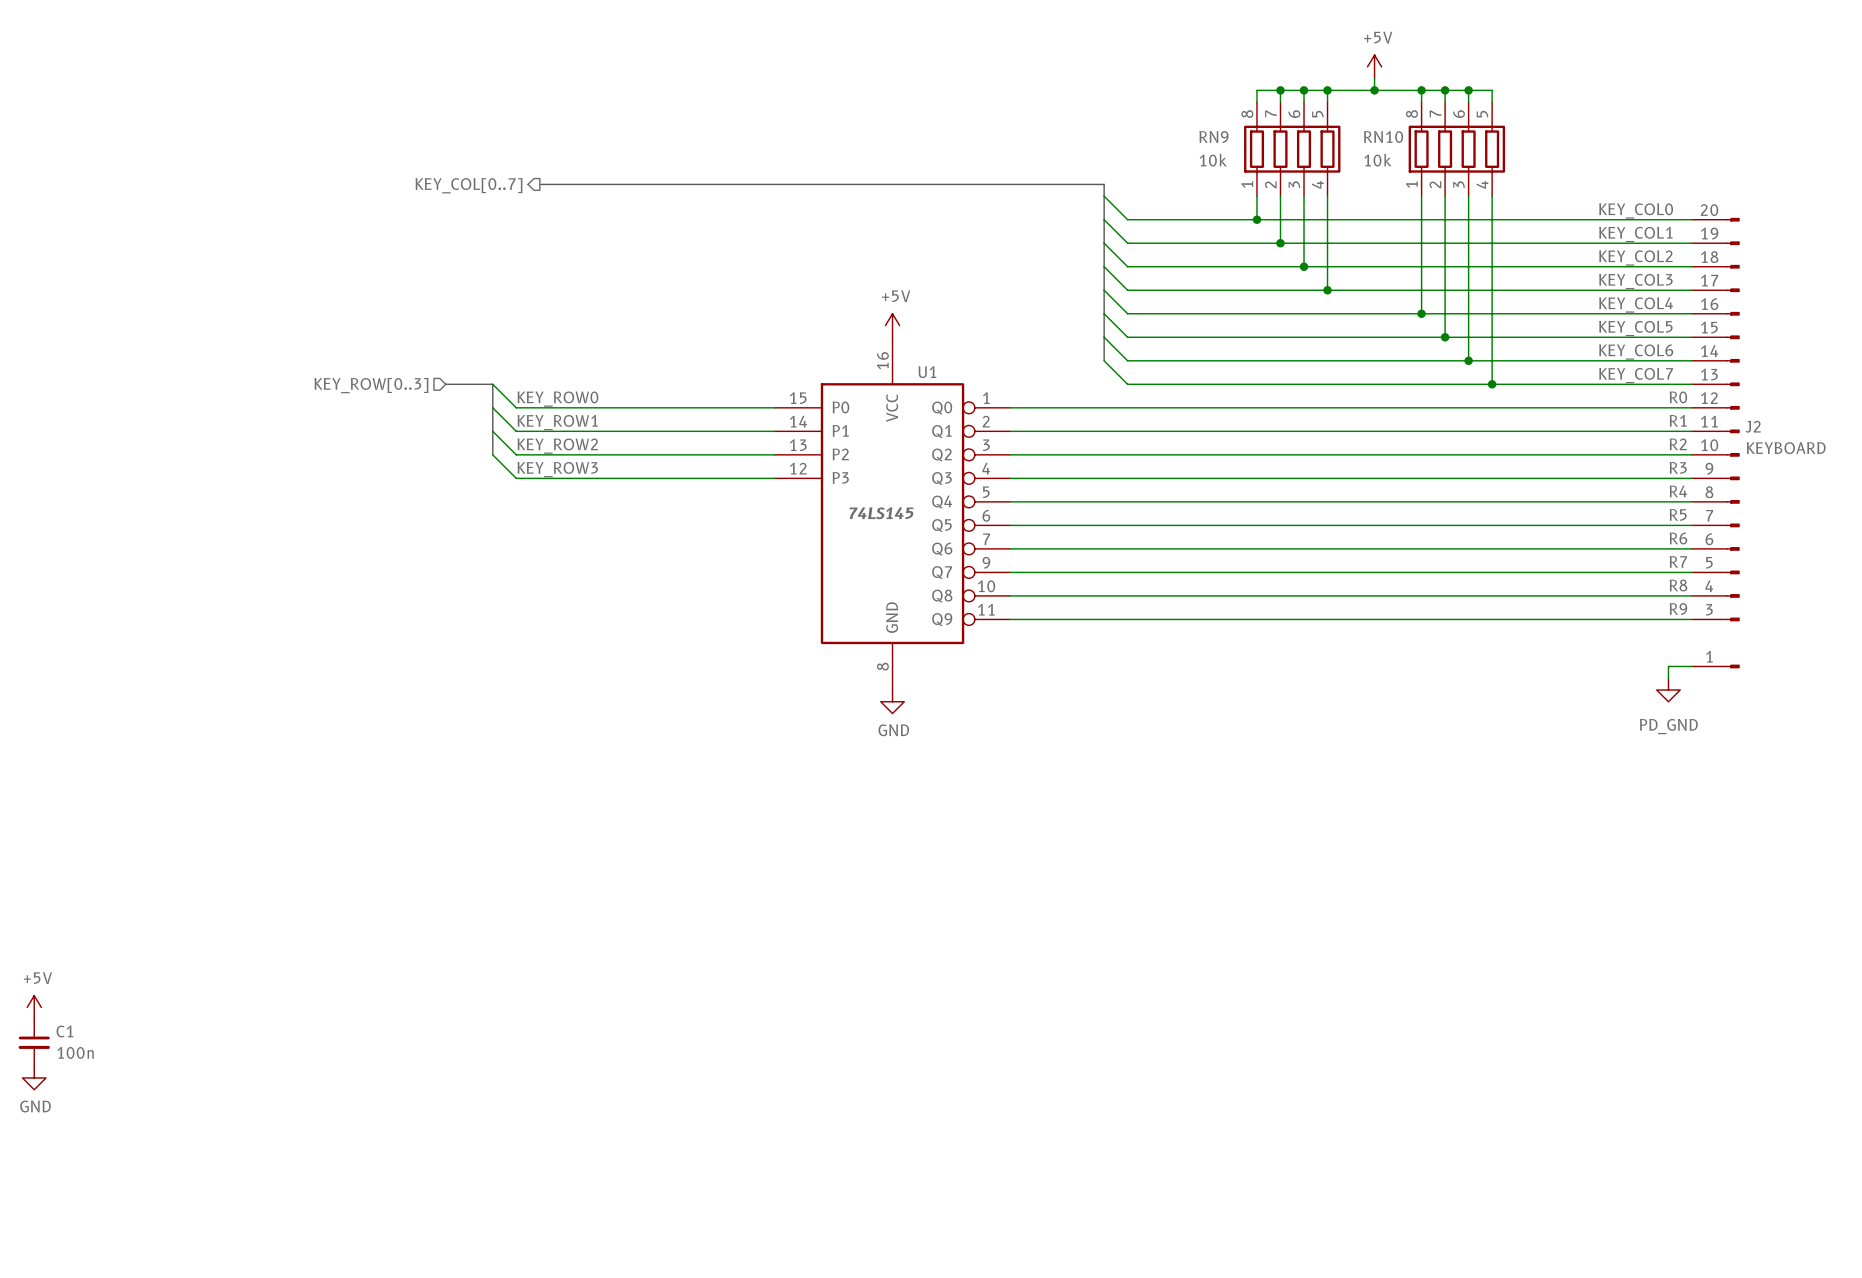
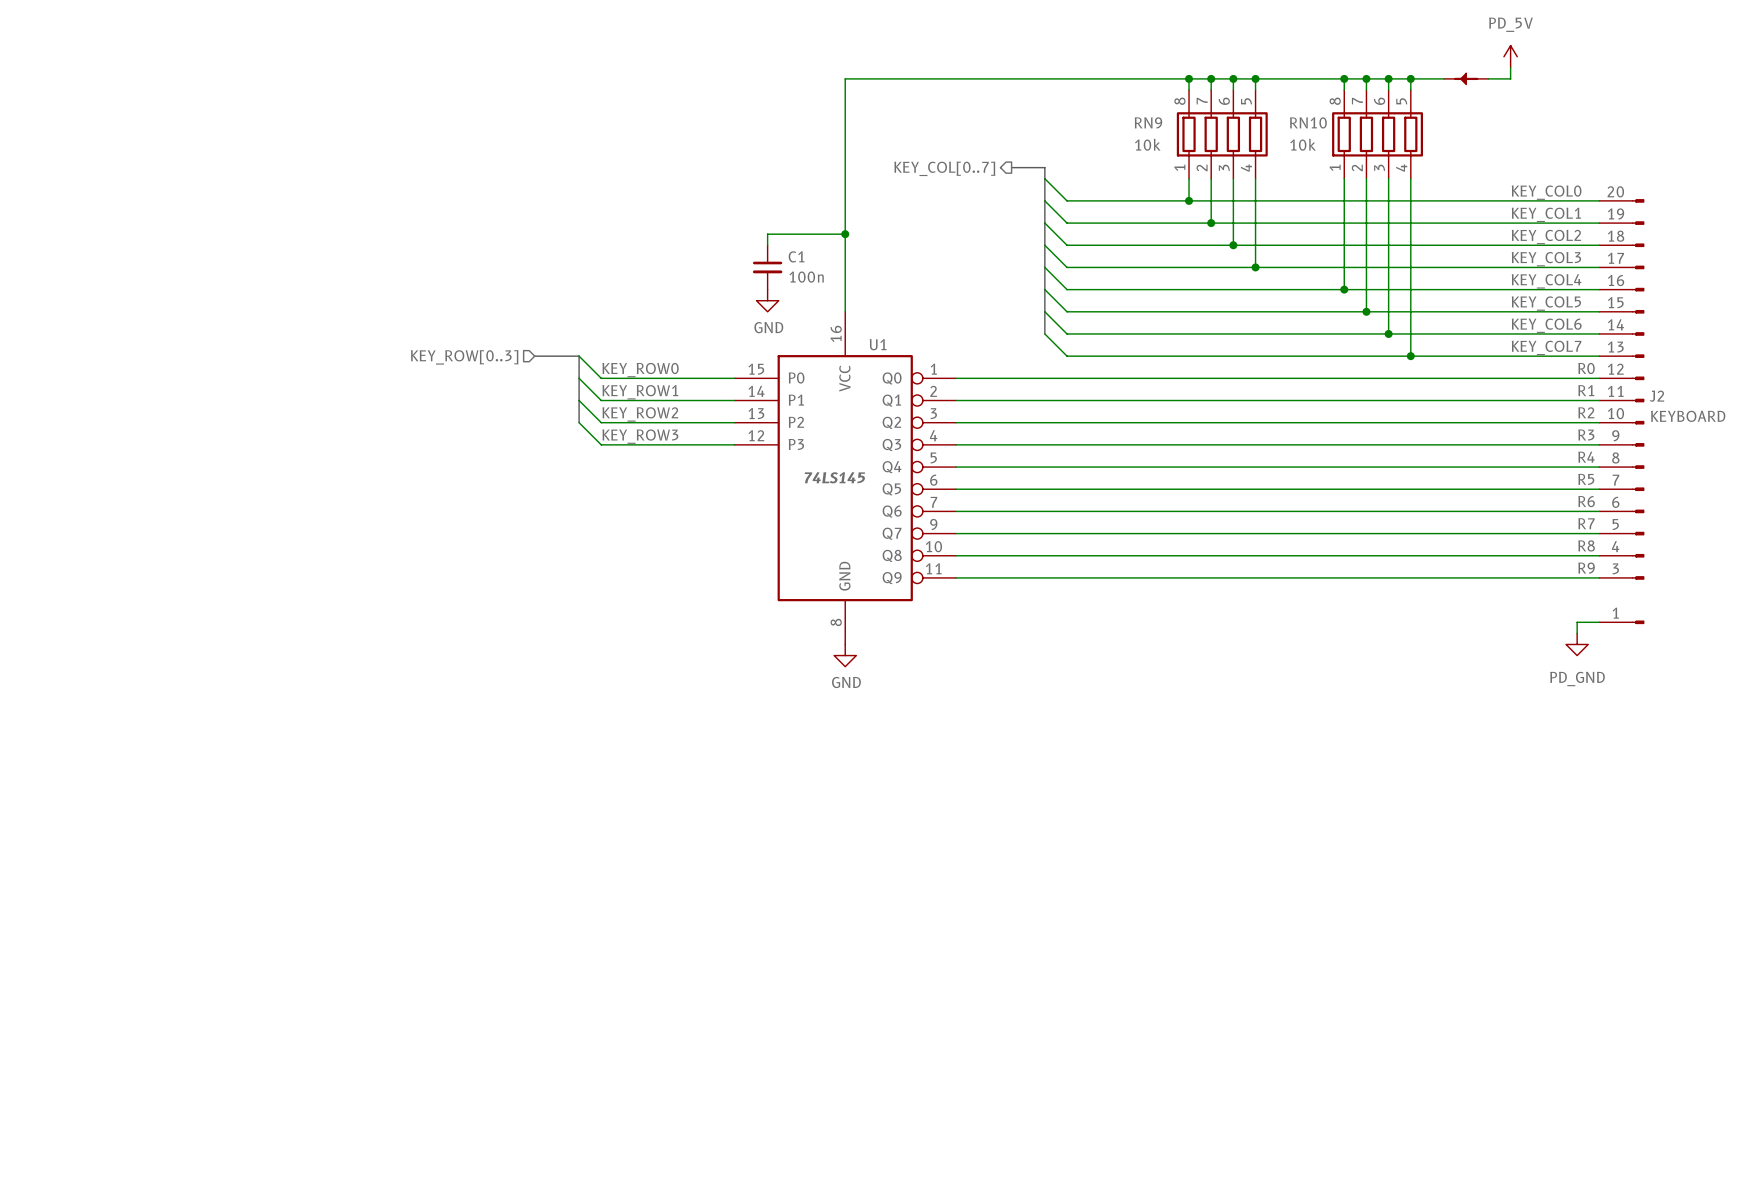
power symbol: +5V (1374, 66) -> none
power symbol: none -> PD_5V (1510, 56)
wire: (1374, 78) (1374, 90) -> none
wire: none -> (1510, 67) (1510, 78) (1488, 78)
wire: none -> (1189, 78) (845, 78) (845, 311)
junction: none -> (1189, 78)
junction: (1374, 90) -> none
wire: none -> (1410, 78) (1444, 78)
junction: none -> (1410, 78)
part: none -> (1466, 78)
bus: (539, 184) (1068, 184) -> none
hierarchical label: KEY_COL[0..7] (469, 185) -> none
hierarchical label: none -> KEY_COL[0..7] (944, 168)
wire: none -> (845, 234) (767, 234) (767, 245)
junction: none -> (845, 234)
power symbol: none -> GND (767, 300)
power symbol: +5V (892, 325) -> none
bus: (445, 384) (492, 384) (492, 454) -> (534, 356) (579, 356) (579, 422)
wire: (492, 384) (516, 407) (633, 407) -> (579, 356) (601, 378)
hierarchical label position: KEY_ROW[0..3] (371, 385) -> KEY_ROW[0..3] (464, 357)
label position: KEY_ROW0 (557, 399) -> KEY_ROW0 (640, 370)
wire: (492, 407) (516, 431) (633, 431) -> (579, 378) (601, 400)
label position: KEY_ROW1 (557, 422) -> KEY_ROW1 (640, 392)
wire: (492, 431) (516, 454) (633, 454) -> (579, 400) (601, 422)
label position: KEY_ROW2 (557, 446) -> KEY_ROW2 (640, 414)
wire: (492, 454) (516, 478) (633, 478) -> (579, 422) (601, 444)
label position: KEY_ROW3 (557, 469) -> KEY_ROW3 (640, 436)
power symbol: +5V (34, 1007) -> none
C1 position: (34, 1042) -> (767, 267)
power symbol: GND (34, 1077) -> none

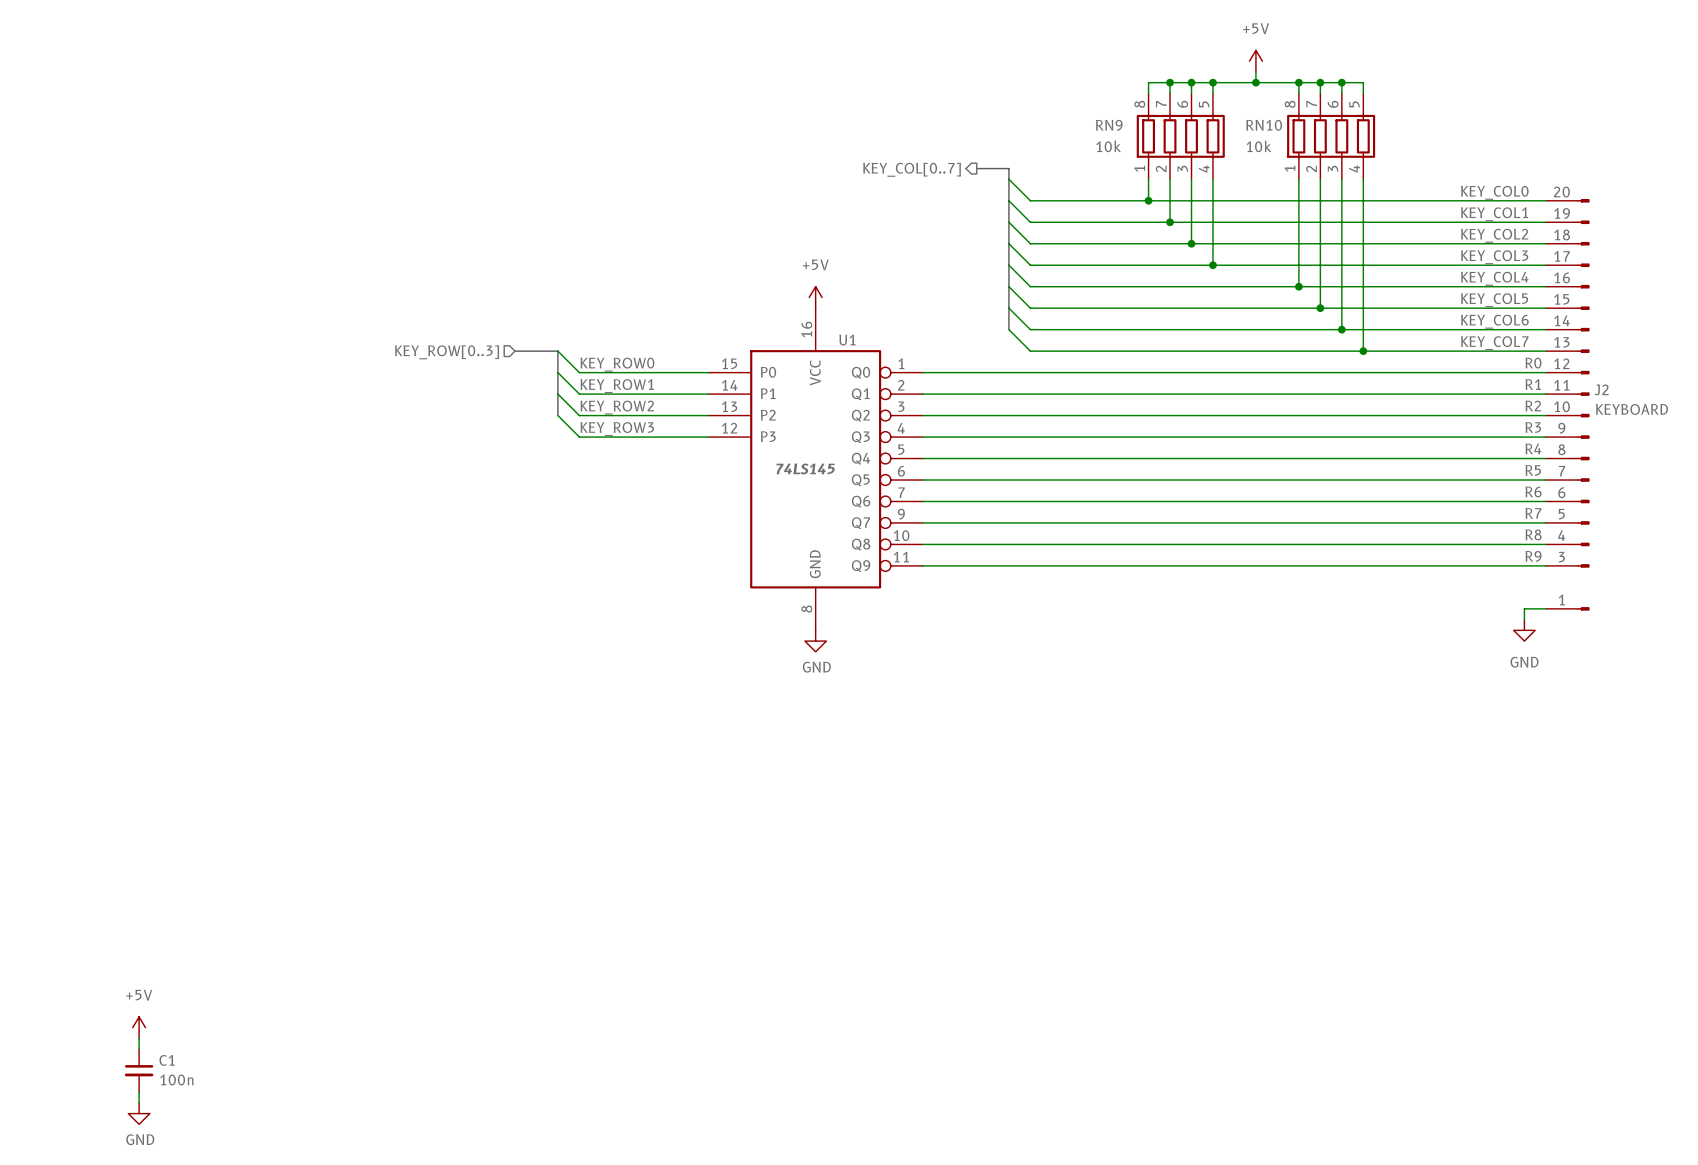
power symbol: none -> +5V (1255, 61)
power symbol: PD_5V (1510, 56) -> none
wire: none -> (1255, 71) (1255, 82)
wire: (1510, 67) (1510, 78) (1488, 78) -> none
wire: (1189, 78) (845, 78) (845, 311) -> none
junction: (1189, 78) -> none
junction: none -> (1255, 82)
wire: (1410, 78) (1444, 78) -> none
junction: (1410, 78) -> none
part: (1466, 78) -> none
wire: (845, 234) (767, 234) (767, 245) -> none
junction: (845, 234) -> none
C1 position: (767, 267) -> (139, 1070)
power symbol: GND (767, 300) -> none
power symbol: none -> +5V (815, 297)
power symbol: PD_GND (1577, 644) -> GND (1524, 630)
power symbol: none -> +5V (139, 1027)
wire: none -> (139, 1038) (139, 1049)
wire: none -> (139, 1092) (139, 1102)
power symbol: none -> GND (139, 1113)

